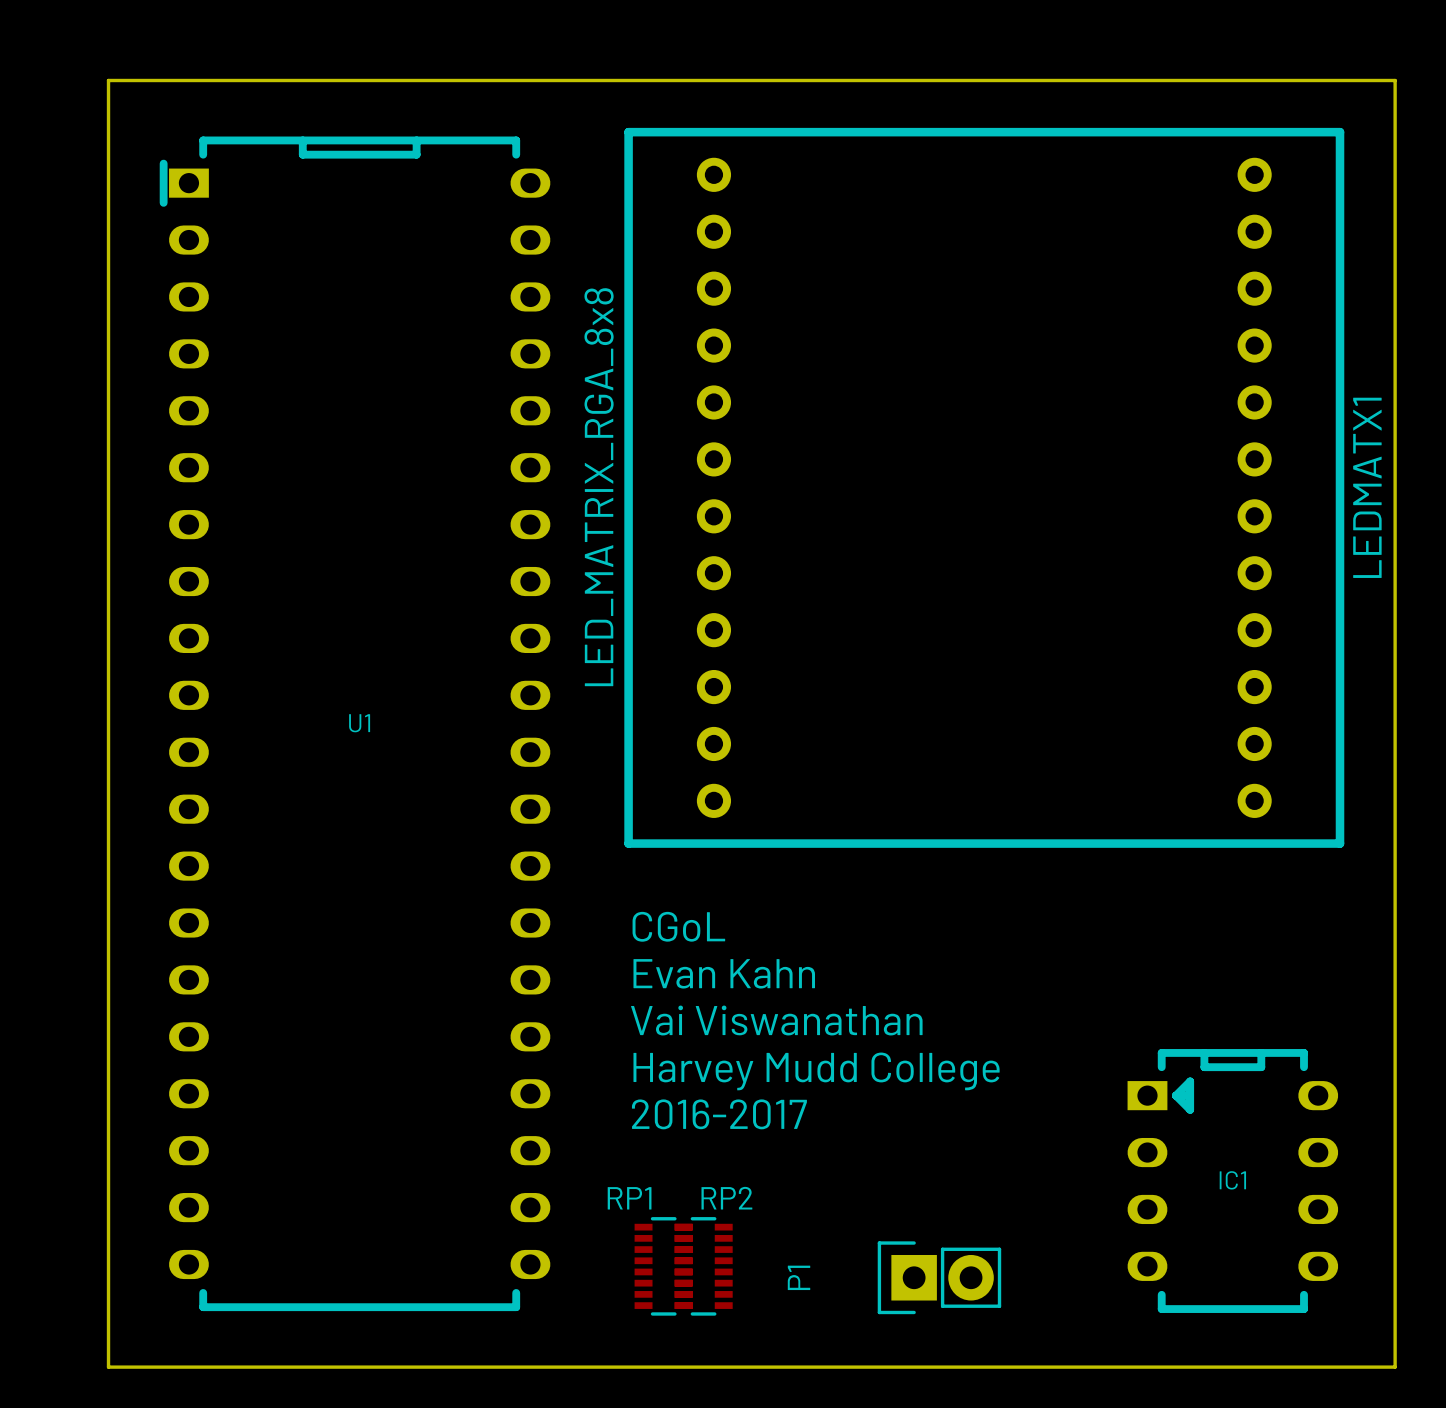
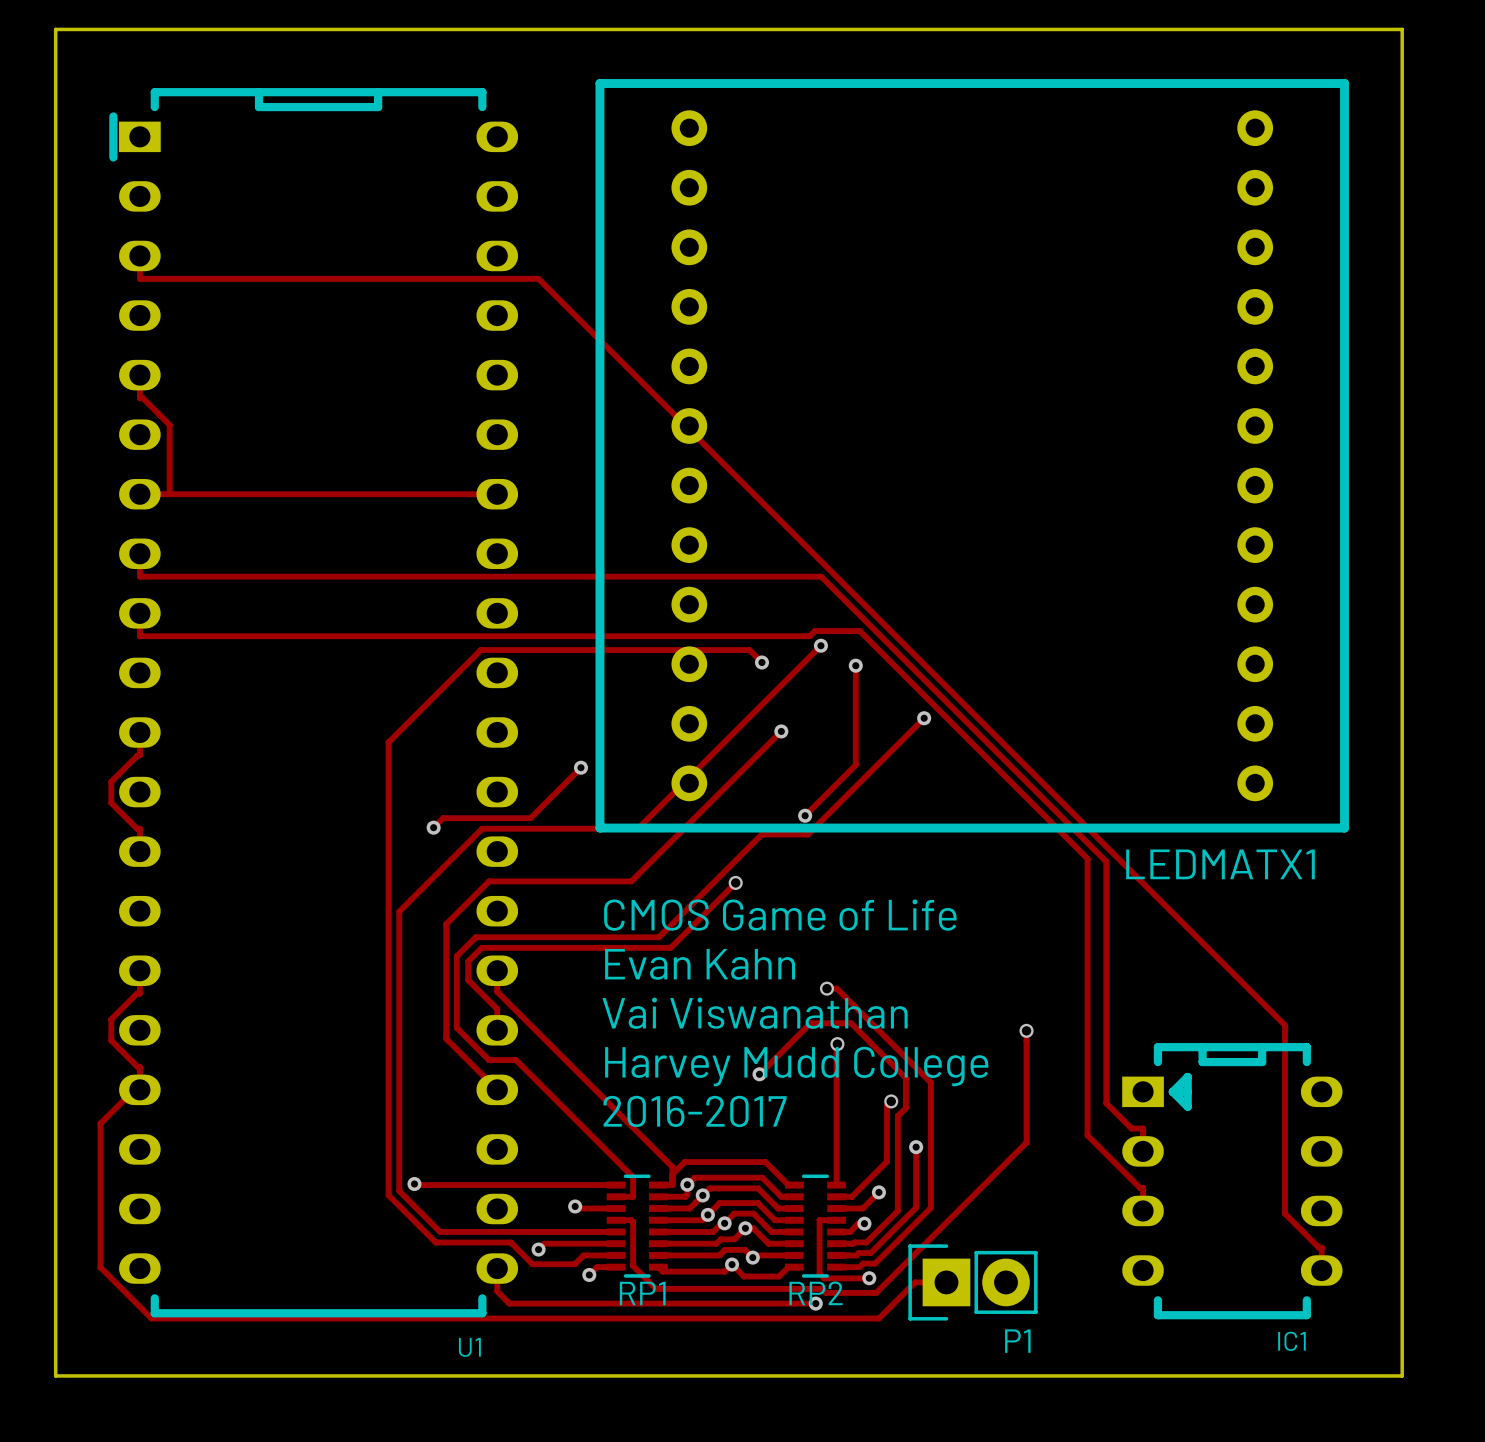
track: none -> (139, 255) (139, 278) (538, 278) (1285, 1025) (1285, 1213) (1318, 1247) (1321, 1247) (1321, 1270)
track: none -> (139, 375) (139, 397) (142, 397) (169, 424) (169, 494)
LEDMATX1 value: LED_MATRIX_RGA_8x8 (599, 487) -> none
LEDMATX1 name rotation: 0° (1367, 487) -> 90° clockwise (1220, 864)
LEDMATX1 name position: LEDMATX1 (1367, 487) -> LEDMATX1 (1220, 864)
track: none -> (139, 494) (497, 494)
track: none -> (139, 553) (139, 576) (821, 576) (1106, 861) (1106, 1103) (1131, 1128) (1143, 1128) (1143, 1151)
track: none -> (139, 613) (139, 636) (809, 636) (814, 631) (859, 631) (1087, 858) (1087, 1135) (1140, 1188) (1143, 1188) (1143, 1210)
track: none -> (820, 645) (637, 828) (482, 828) (399, 911) (399, 1191) (440, 1231) (616, 1231)
via: none -> (820, 645)
track: none -> (761, 662) (749, 650) (480, 650) (388, 742) (388, 1195) (435, 1242) (510, 1242) (532, 1264) (574, 1264) (583, 1255) (616, 1255)
via: none -> (761, 662)
track: none -> (855, 665) (855, 765) (805, 815)
via: none -> (855, 665)
U1 name position: U1 (359, 723) -> U1 (469, 1347)
track: none -> (924, 718) (807, 834) (761, 834) (658, 937) (475, 937) (456, 956) (456, 1027) (488, 1060) (515, 1060) (633, 1177) (633, 1196) (616, 1196)
via: none -> (924, 718)
track: none -> (781, 731) (631, 881) (488, 881) (446, 924) (446, 1038) (497, 1089)
via: none -> (781, 731)
track: none -> (139, 732) (139, 755) (111, 781) (111, 802) (137, 828) (139, 828) (139, 851)
track: none -> (580, 767) (530, 818) (443, 818) (433, 827)
via: none -> (580, 767)
via: none -> (805, 815)
via: none -> (433, 827)
track: none -> (735, 882) (670, 947) (481, 947) (468, 961) (468, 980) (497, 1009) (497, 1030)
via: none -> (735, 882)
text: CGoL (678, 926) -> CMOS Game of Life (780, 915)
track: none -> (139, 970) (139, 993) (137, 993) (111, 1019) (111, 1040) (139, 1067) (139, 1089)
track: none -> (497, 970) (497, 991) (672, 1167) (672, 1185) (658, 1185)
track: none -> (826, 988) (836, 988) (930, 1082) (930, 1207) (875, 1263) (863, 1263) (859, 1267) (836, 1267)
via: none -> (826, 988)
track: none -> (1026, 1030) (1026, 1142) (876, 1292) (825, 1292) (821, 1288) (656, 1288) (633, 1266) (633, 1222) (631, 1220) (616, 1220)
via: none -> (1026, 1030)
track: none -> (837, 1044) (836, 1185)
via: none -> (837, 1044)
track: none -> (759, 1074) (810, 1023) (851, 1023) (905, 1078) (905, 1108) (897, 1116) (897, 1210) (866, 1242) (836, 1243)
via: none -> (759, 1074)
track: none -> (139, 1084) (100, 1123) (100, 1267) (151, 1318) (878, 1318) (915, 1282) (946, 1282)
track: none -> (891, 1101) (886, 1105) (886, 1161) (851, 1196) (836, 1196)
via: none -> (891, 1101)
track: none -> (916, 1147) (916, 1207) (870, 1253) (836, 1255)
via: none -> (916, 1147)
track: none -> (672, 1174) (684, 1162) (765, 1162) (788, 1185) (794, 1185)
IC1 name position: IC1 (1232, 1180) -> IC1 (1291, 1341)
track: none -> (414, 1184) (616, 1185)
via: none -> (414, 1184)
via: none -> (687, 1184)
track: none -> (878, 1192) (862, 1208) (836, 1208)
via: none -> (878, 1192)
via: none -> (702, 1195)
track: none -> (658, 1196) (685, 1196) (687, 1194) (687, 1184) (694, 1177) (762, 1177) (781, 1196) (794, 1196)
RP1 name position: RP1 (629, 1198) -> RP1 (642, 1293)
RP2 name position: RP2 (726, 1198) -> RP2 (816, 1293)
track: none -> (575, 1206) (577, 1208) (616, 1208)
via: none -> (575, 1206)
track: none -> (658, 1208) (689, 1208) (709, 1188) (758, 1188) (778, 1208) (794, 1208)
via: none -> (707, 1214)
track: none -> (658, 1220) (702, 1220) (719, 1203) (757, 1203) (775, 1220) (794, 1220)
track: none -> (836, 1220) (819, 1220) (819, 1273) (824, 1278) (869, 1278)
via: none -> (724, 1223)
track: none -> (864, 1223) (858, 1223) (849, 1231) (836, 1231)
via: none -> (864, 1223)
via: none -> (745, 1228)
track: none -> (658, 1231) (713, 1231) (734, 1213) (753, 1213) (771, 1231) (794, 1231)
track: none -> (616, 1243) (544, 1243) (538, 1249)
track: none -> (658, 1243) (716, 1243) (720, 1239) (734, 1239) (745, 1228) (753, 1228) (768, 1243) (794, 1243)
via: none -> (538, 1249)
track: none -> (658, 1255) (719, 1255) (725, 1249) (745, 1249) (752, 1257) (754, 1255) (794, 1255)
via: none -> (752, 1257)
via: none -> (732, 1264)
track: none -> (616, 1267) (597, 1267) (589, 1274)
track: none -> (658, 1267) (662, 1271) (725, 1271) (732, 1264) (744, 1276) (779, 1276) (788, 1267) (794, 1267)
track: none -> (497, 1268) (497, 1291) (509, 1303) (815, 1303)
RP1 position: (663, 1266) -> (637, 1226)
RP2 position: (703, 1266) -> (815, 1226)
via: none -> (589, 1274)
via: none -> (869, 1278)
P1 name rotation: 0° (799, 1277) -> 90° clockwise (1017, 1341)
P1 name position: P1 (799, 1277) -> P1 (1017, 1341)
P1 position: (939, 1277) -> (972, 1282)
via: none -> (815, 1303)

